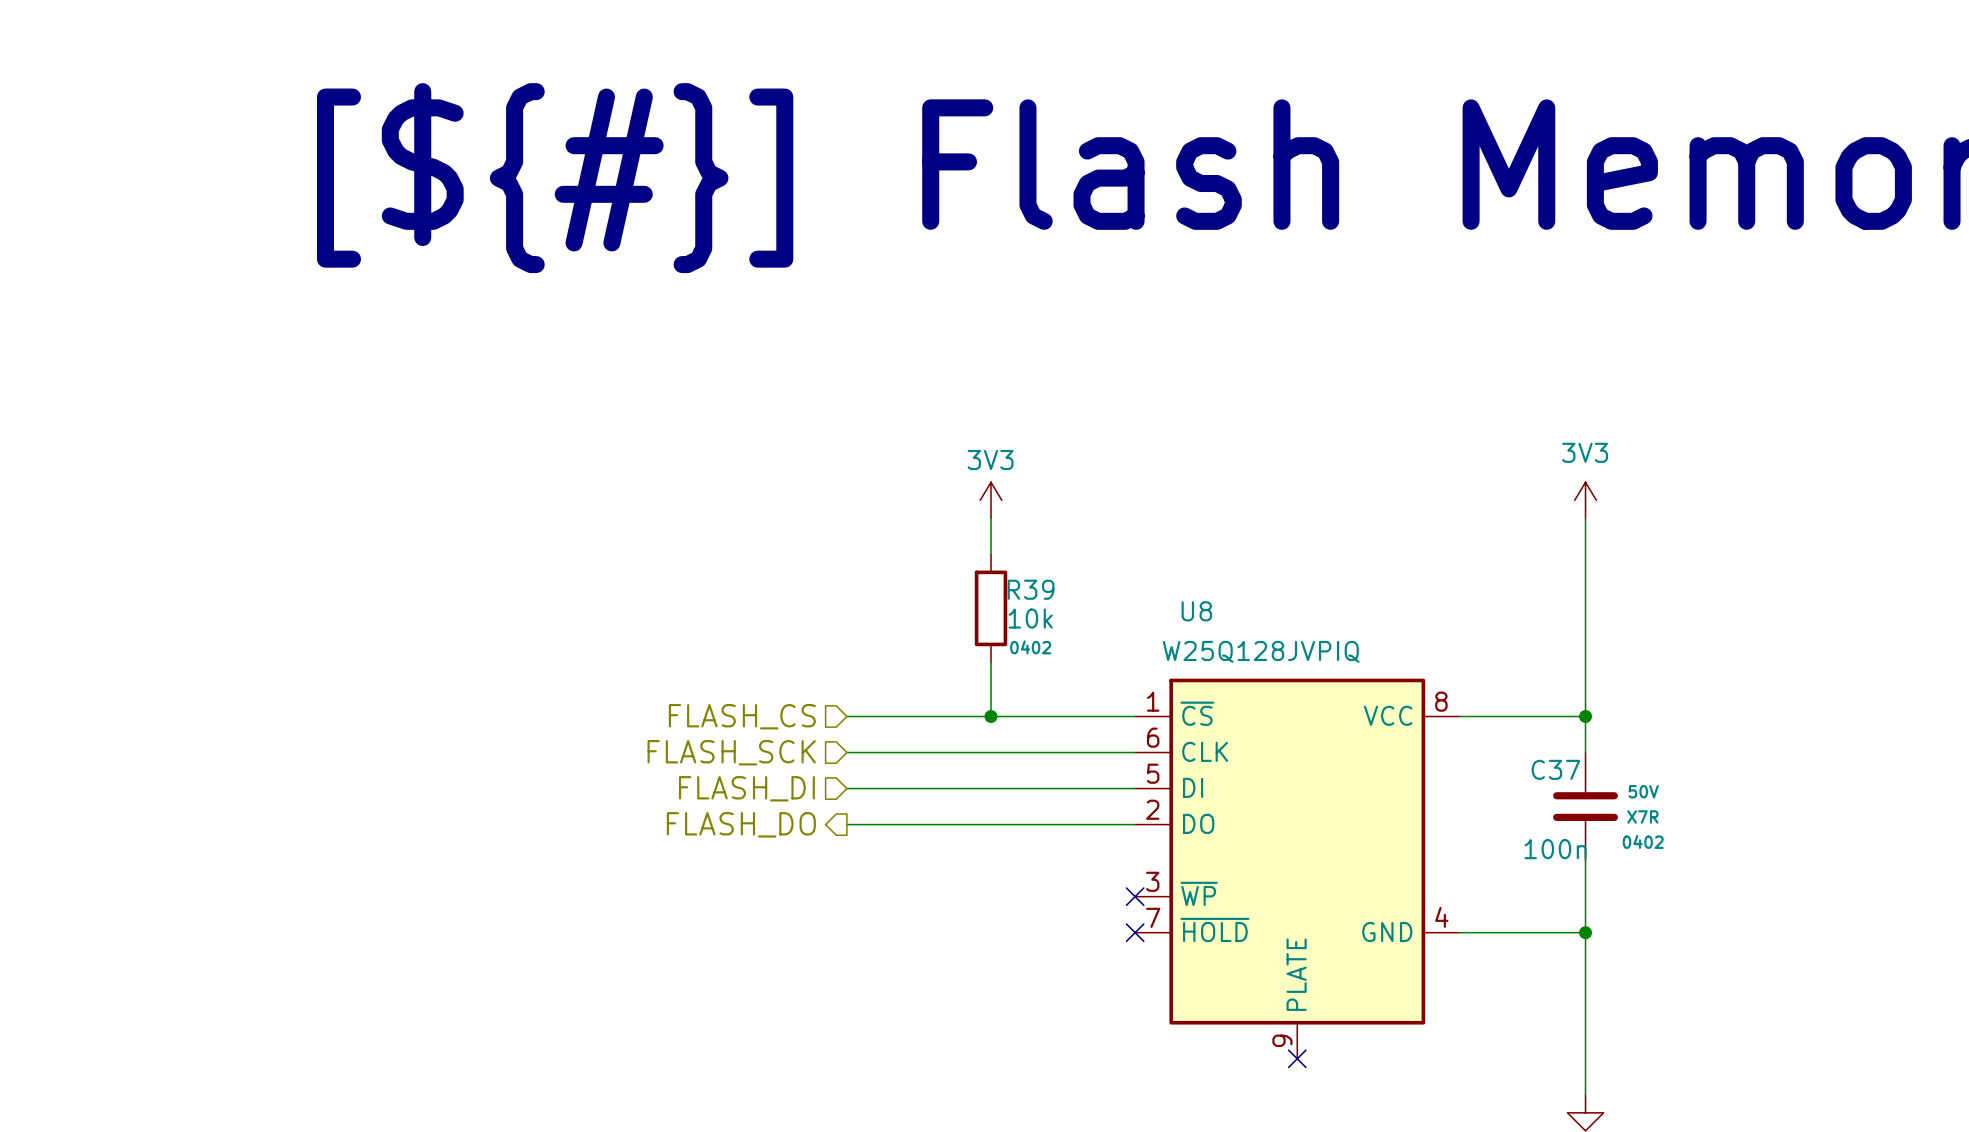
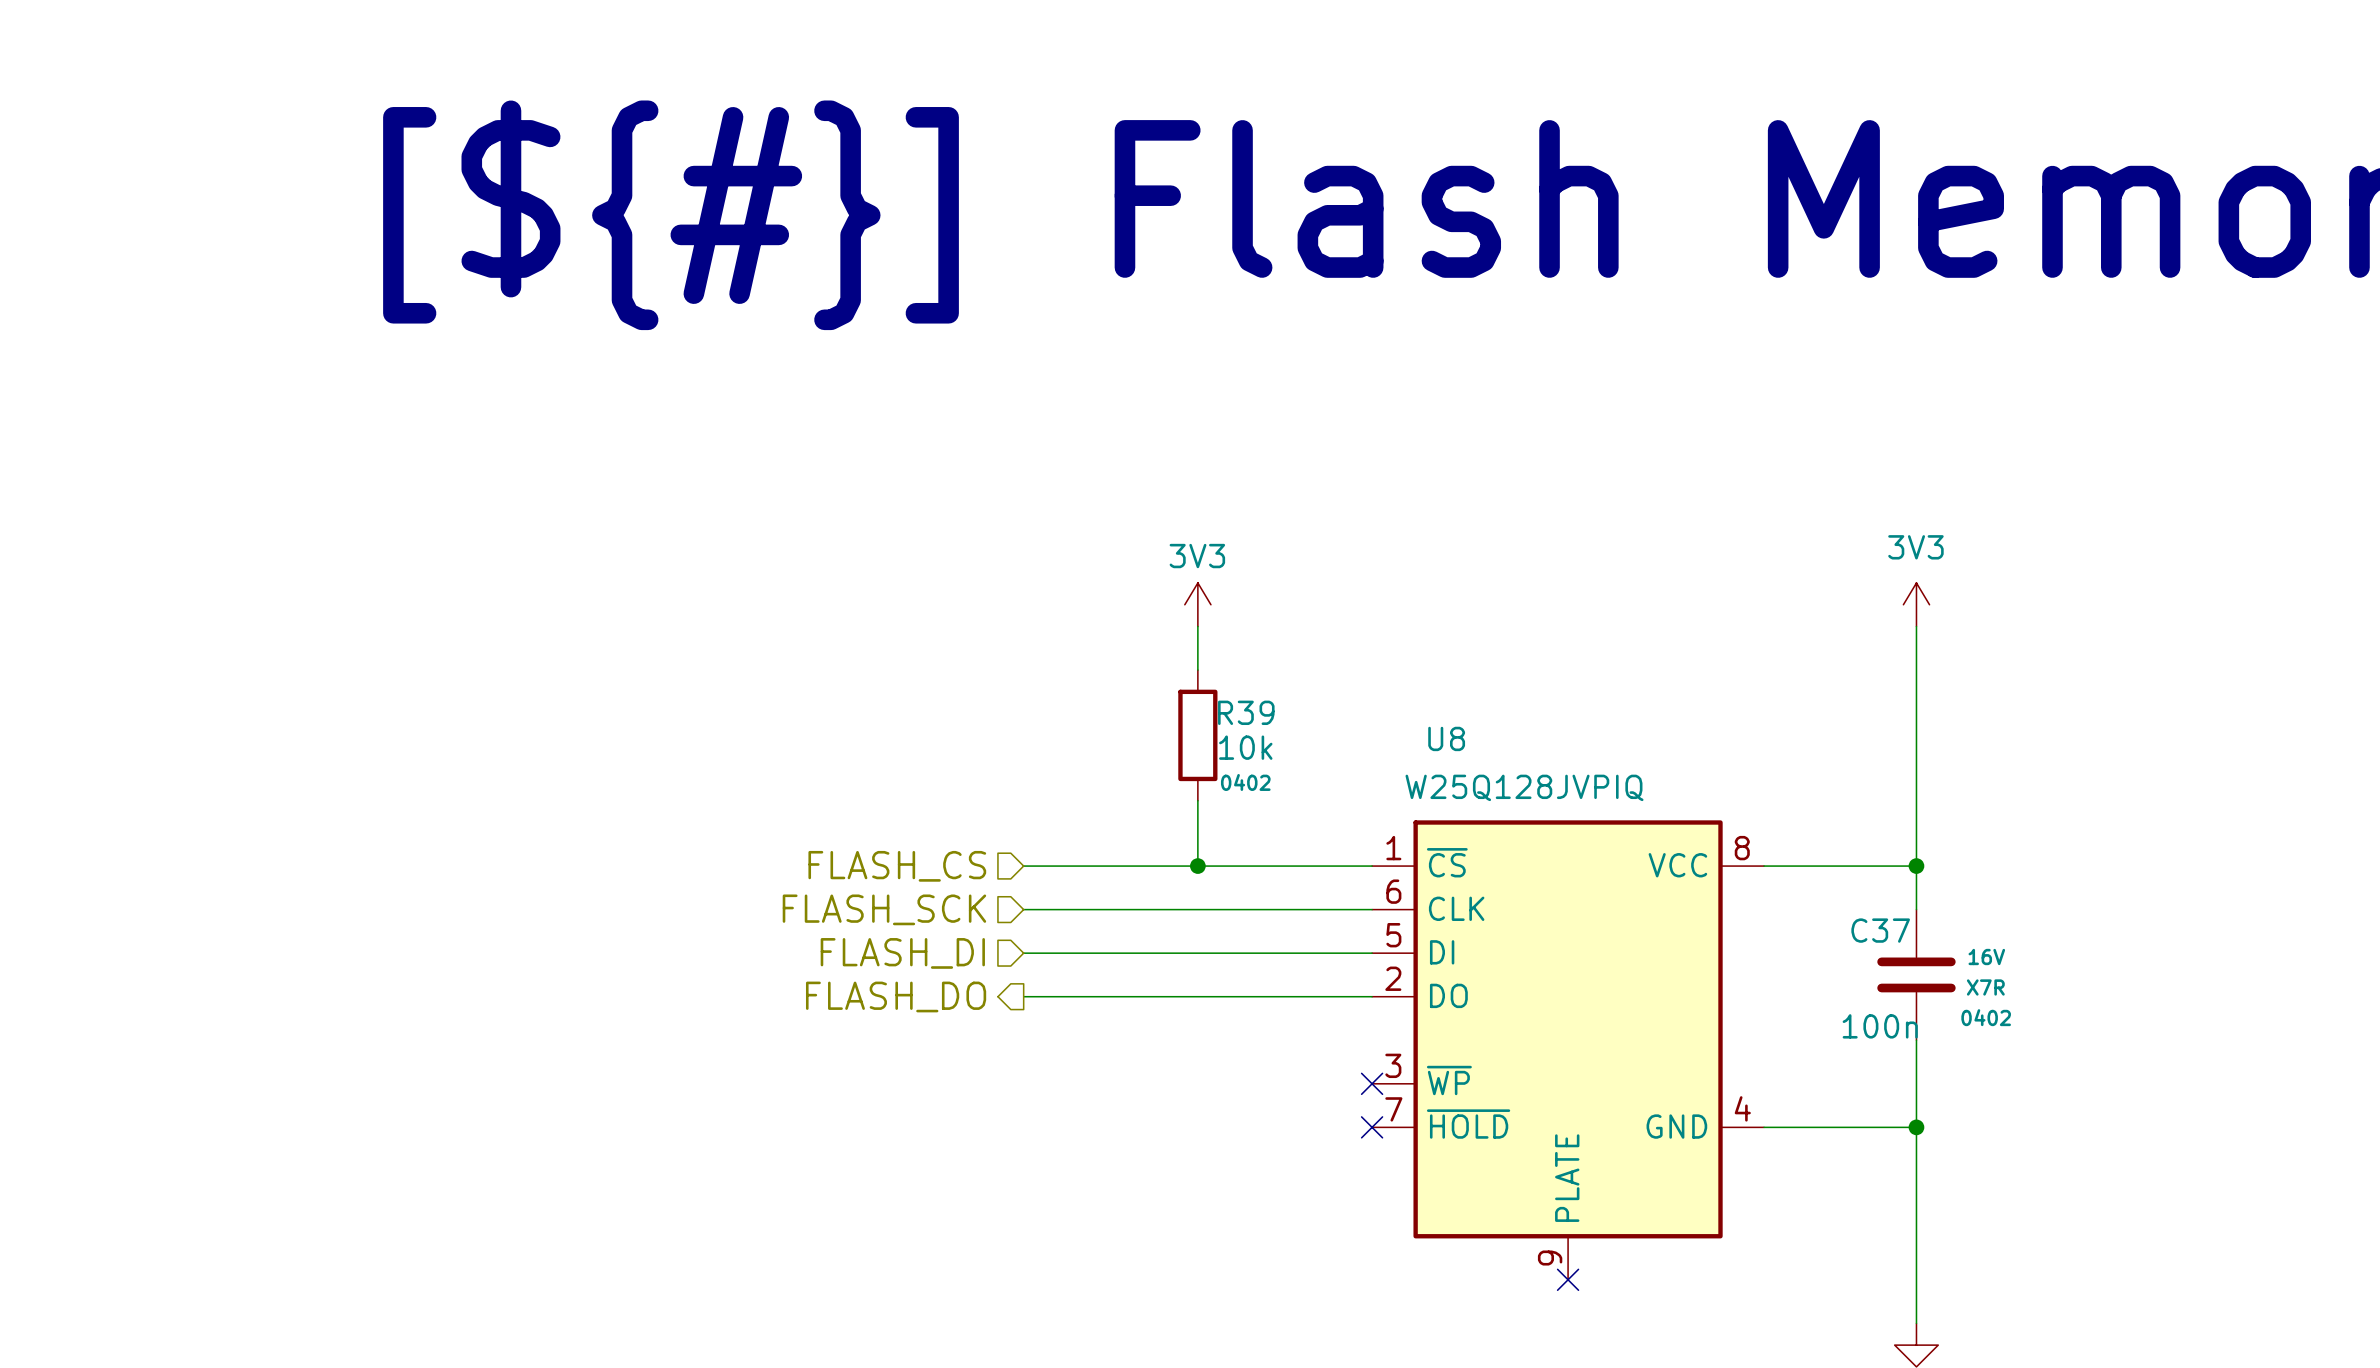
C37 text: 50V (1643, 791) -> 16V (1986, 957)

